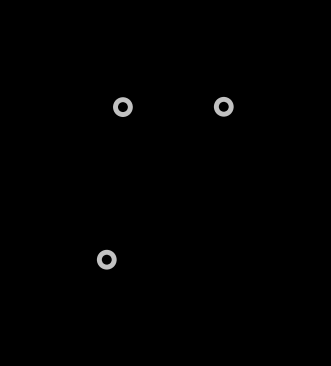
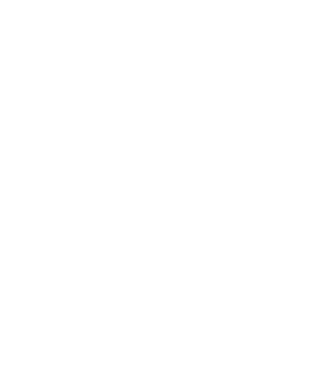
via: (223, 106) -> none
via: (122, 107) -> none
via: (106, 259) -> none

